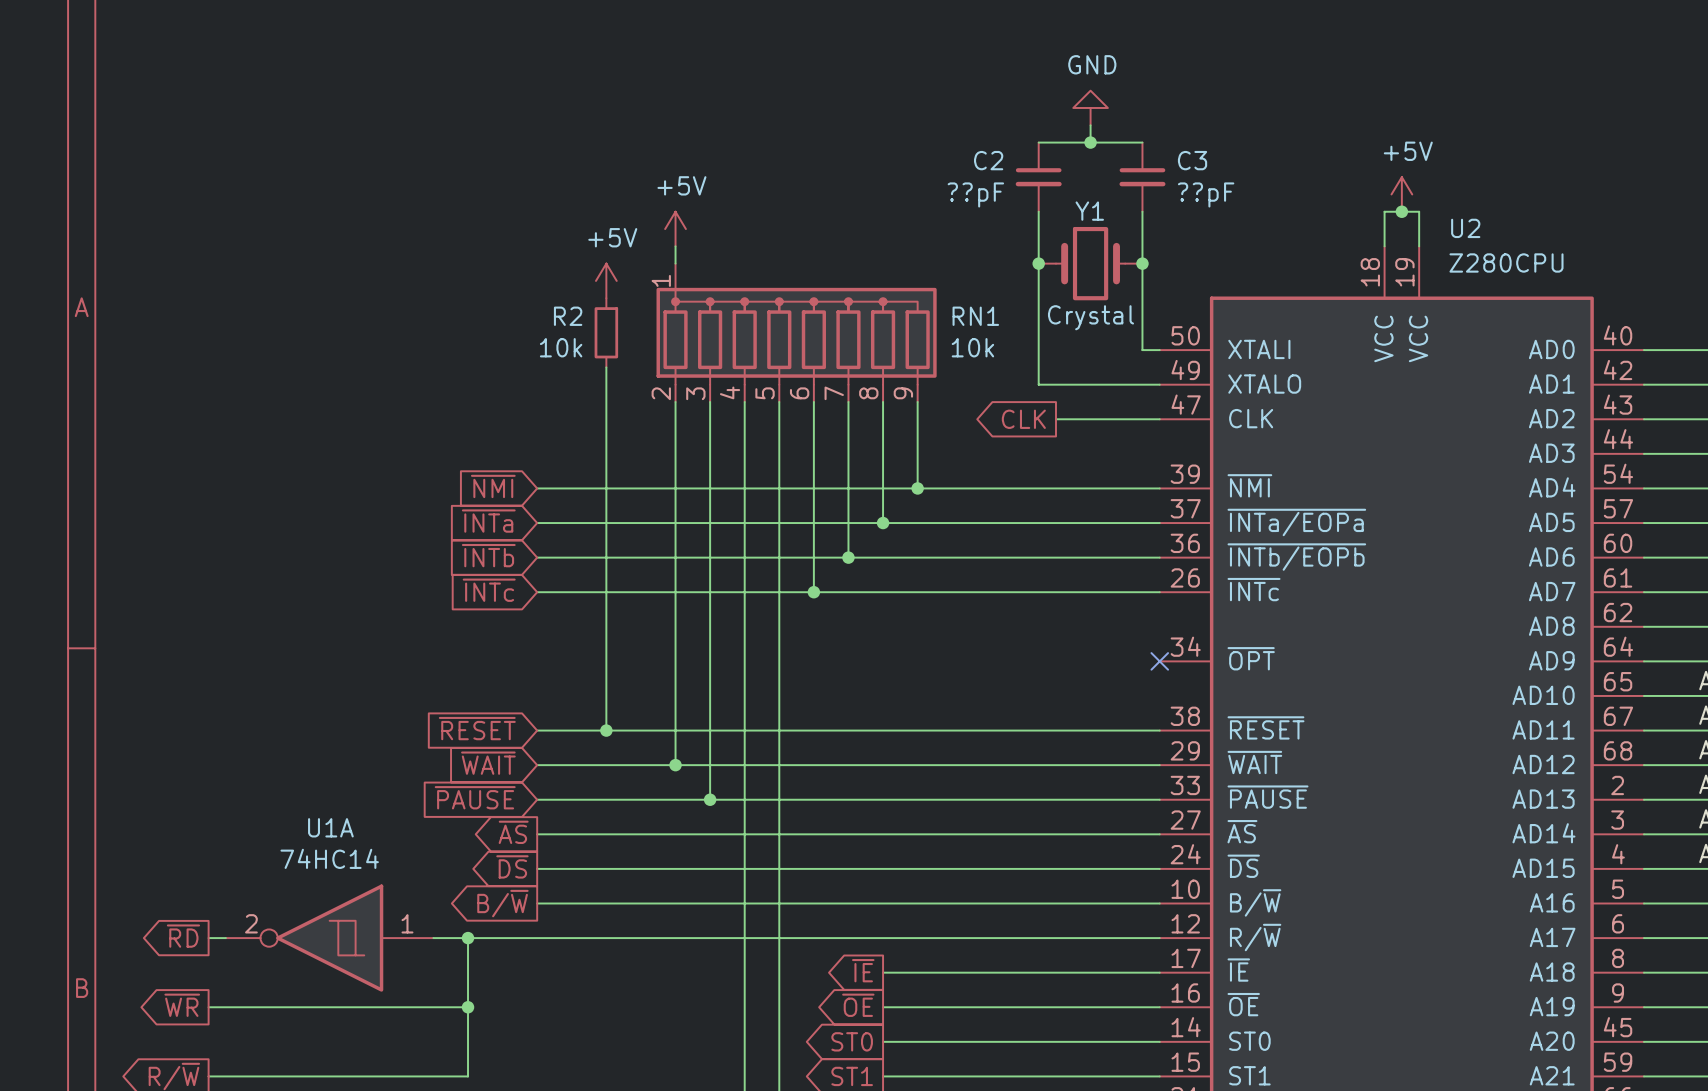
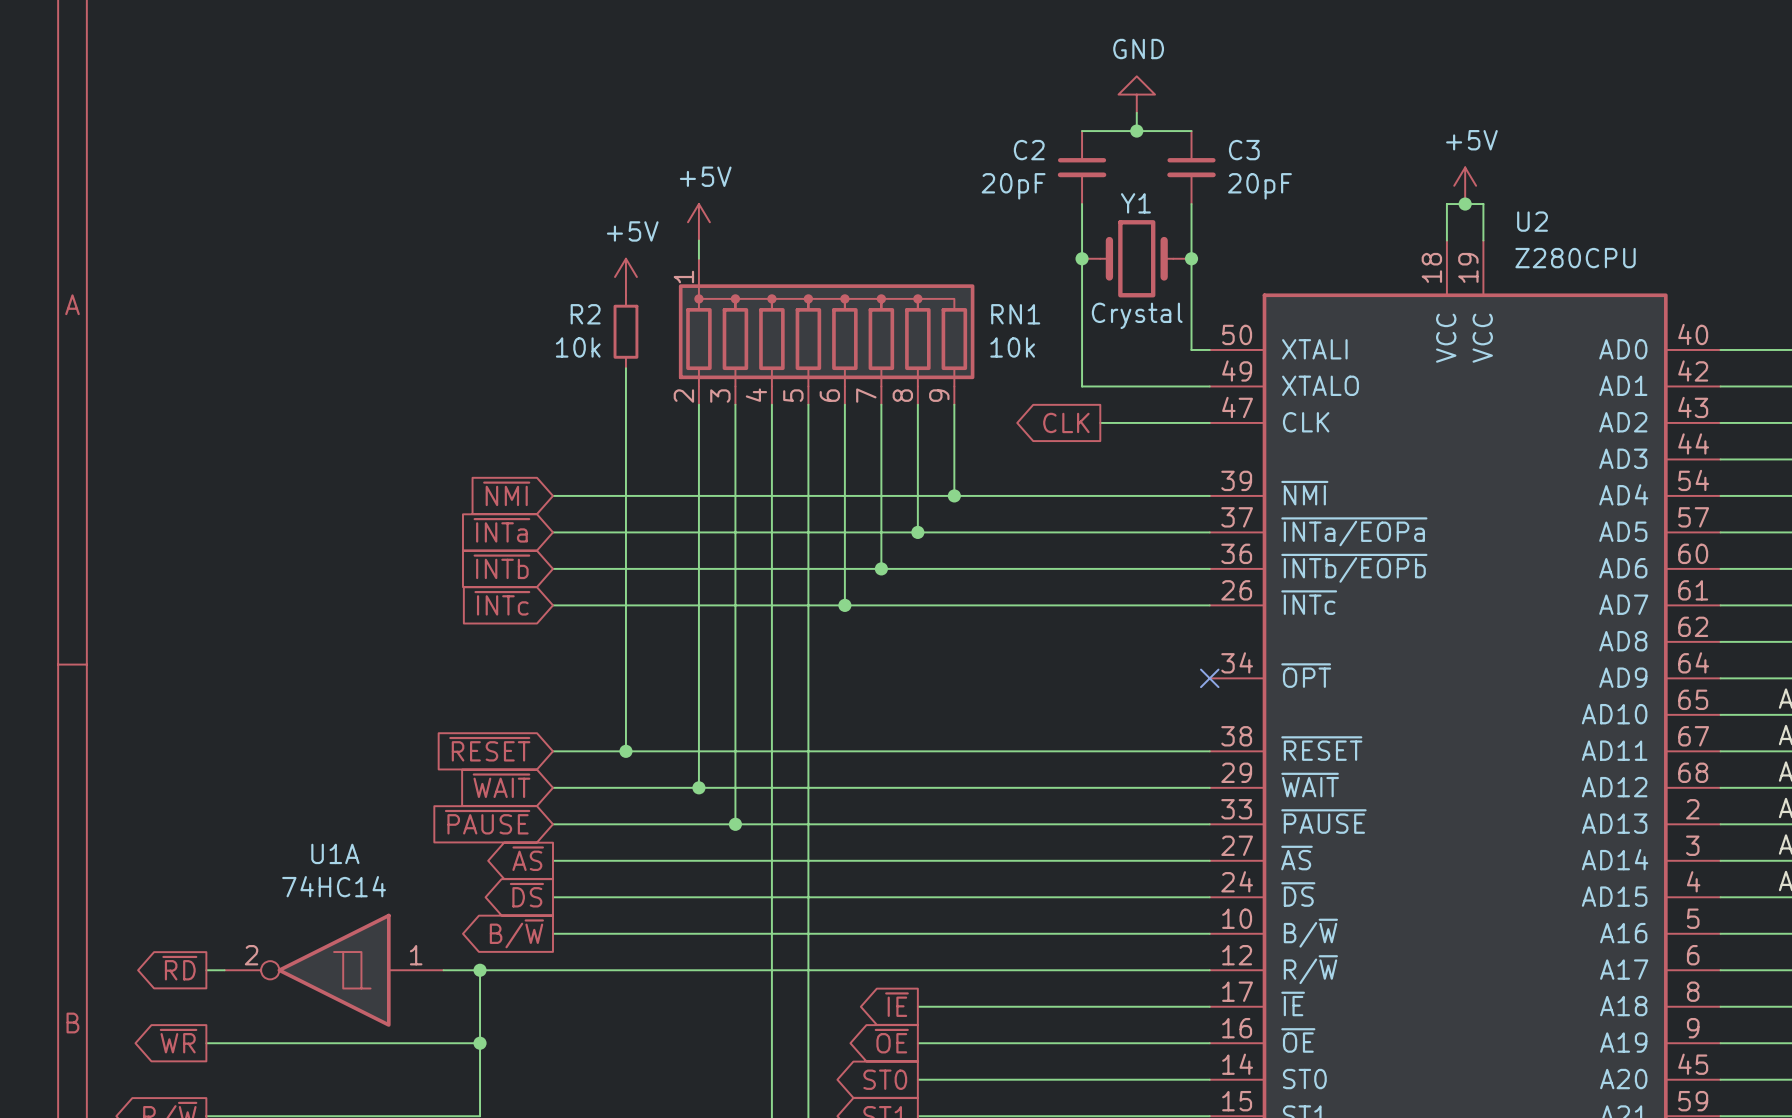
C2 value: ??pF (975, 194) -> 20pF (1013, 186)
C3 value: ??pF (1206, 194) -> 20pF (1259, 186)

